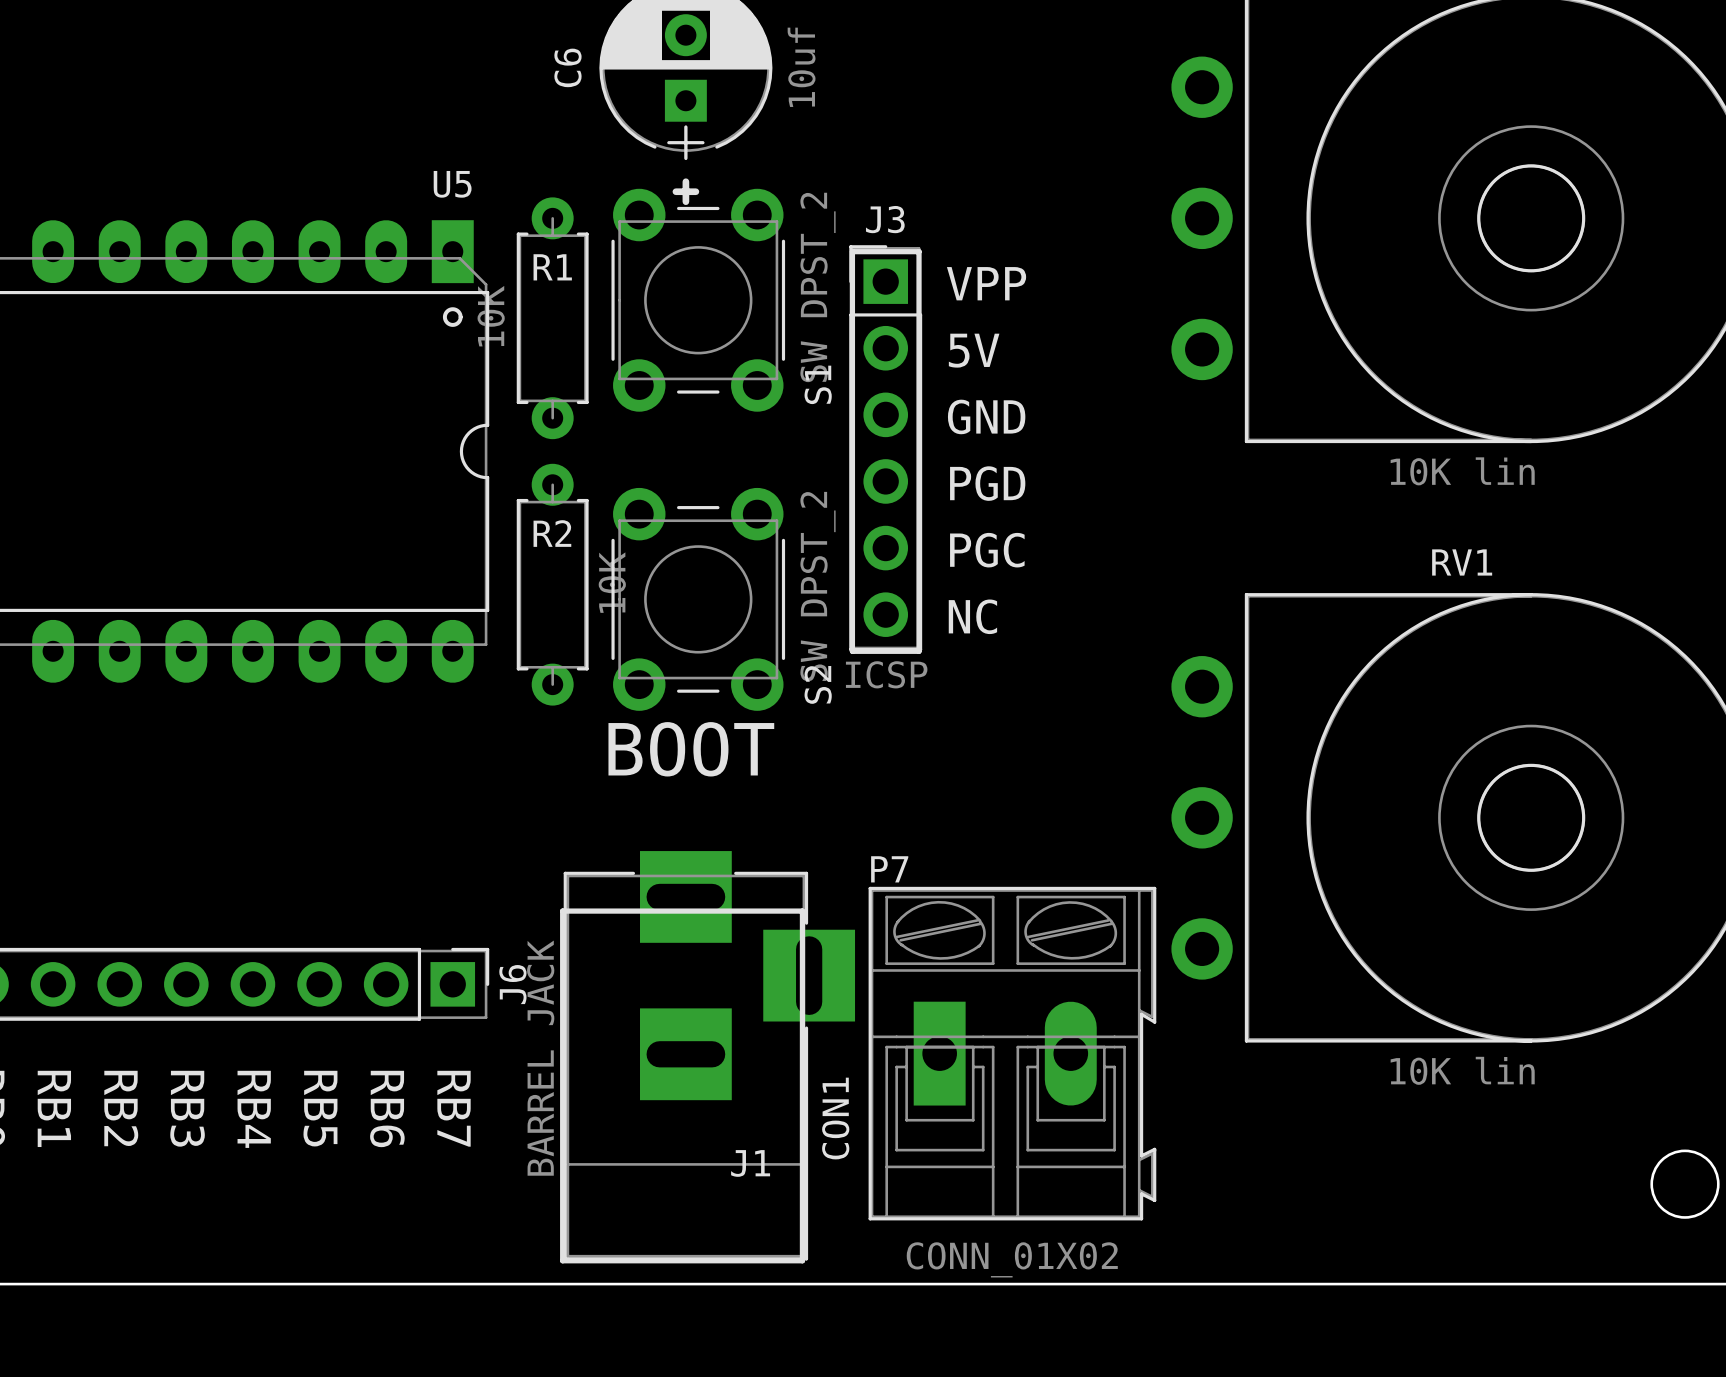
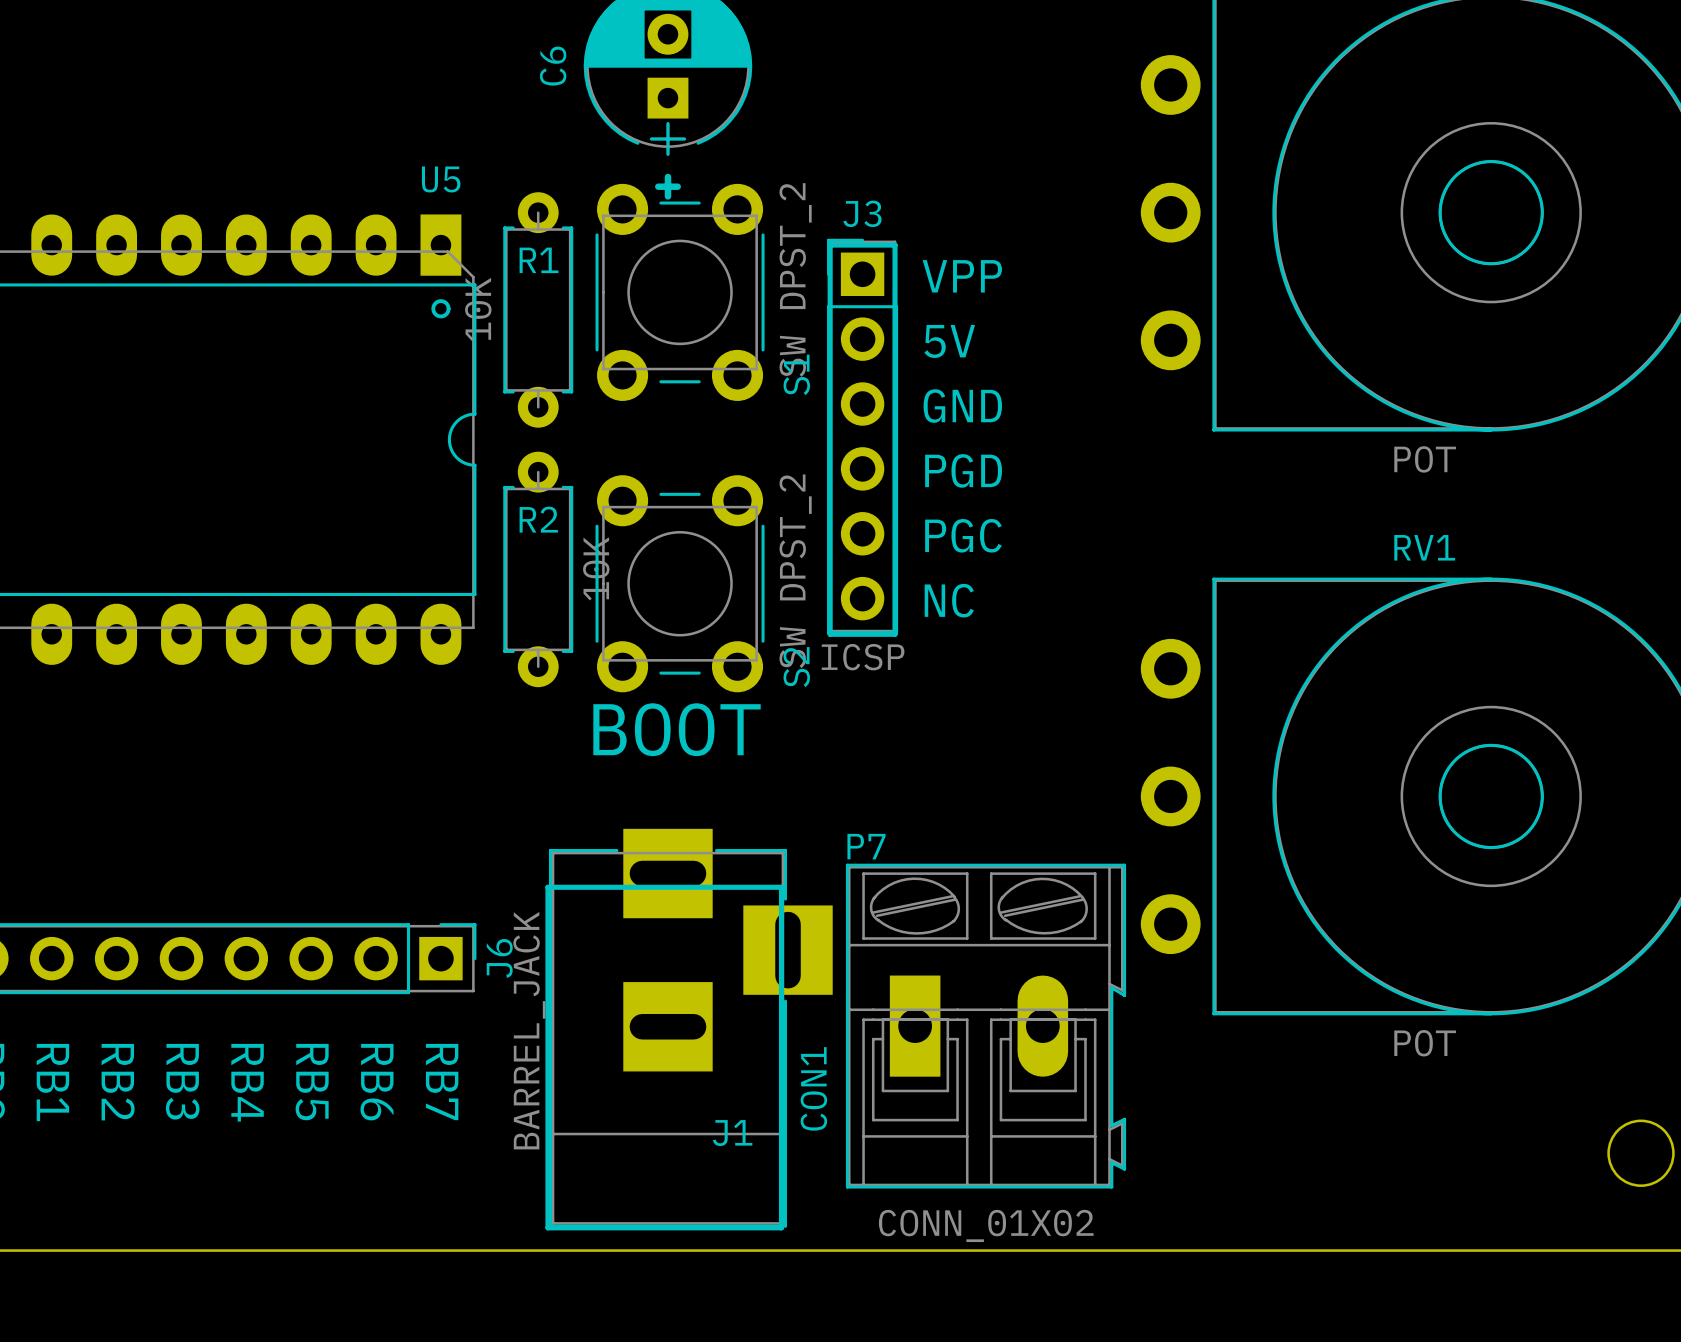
C6 value: 10uf (801, 67) -> none
part value: 10K lin (1462, 471) -> POT (1425, 459)
RV1 value: 10K lin (1462, 1070) -> POT (1425, 1043)

